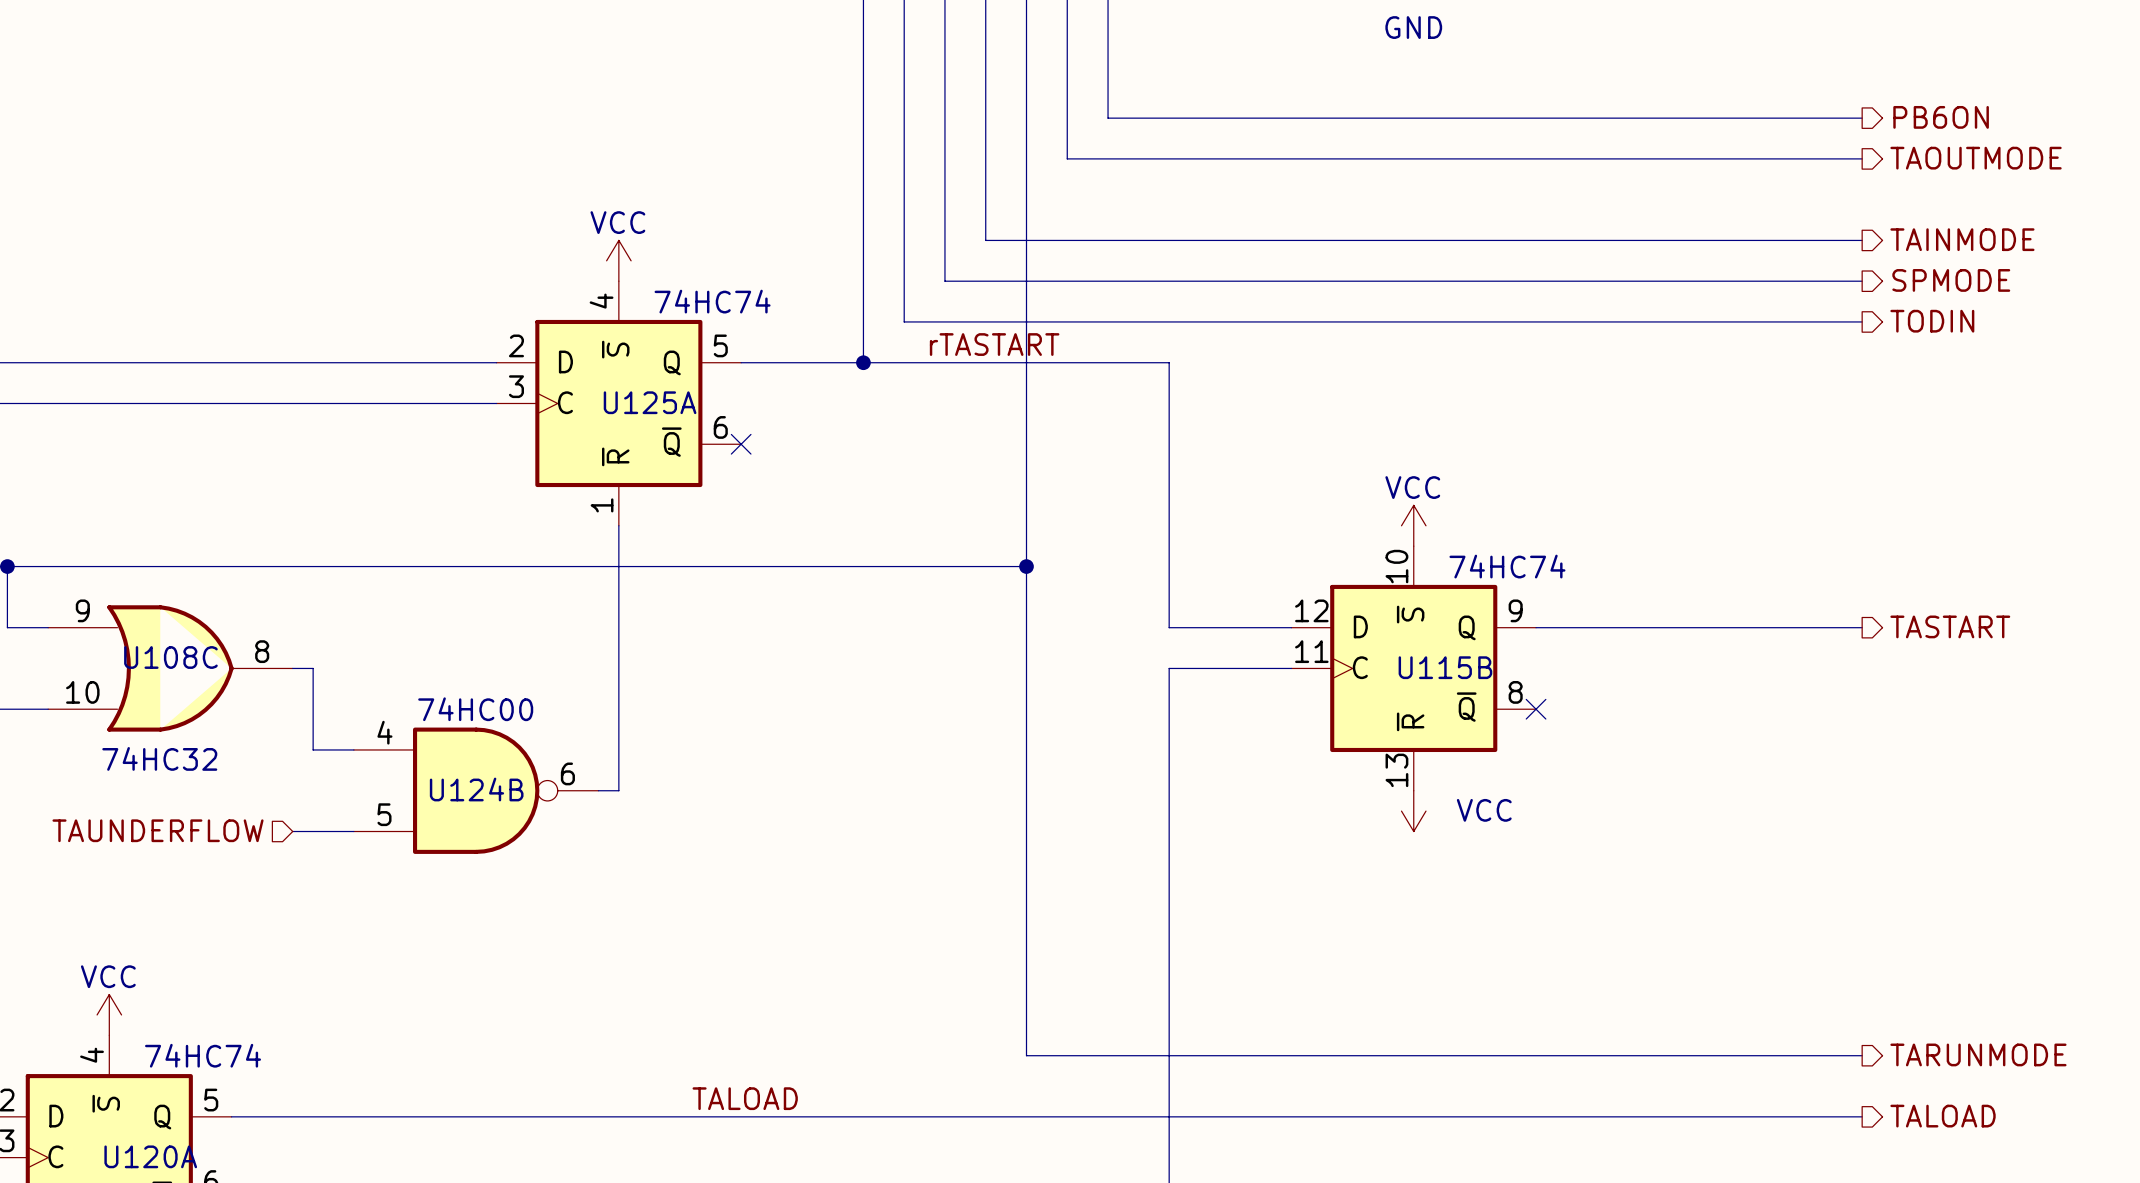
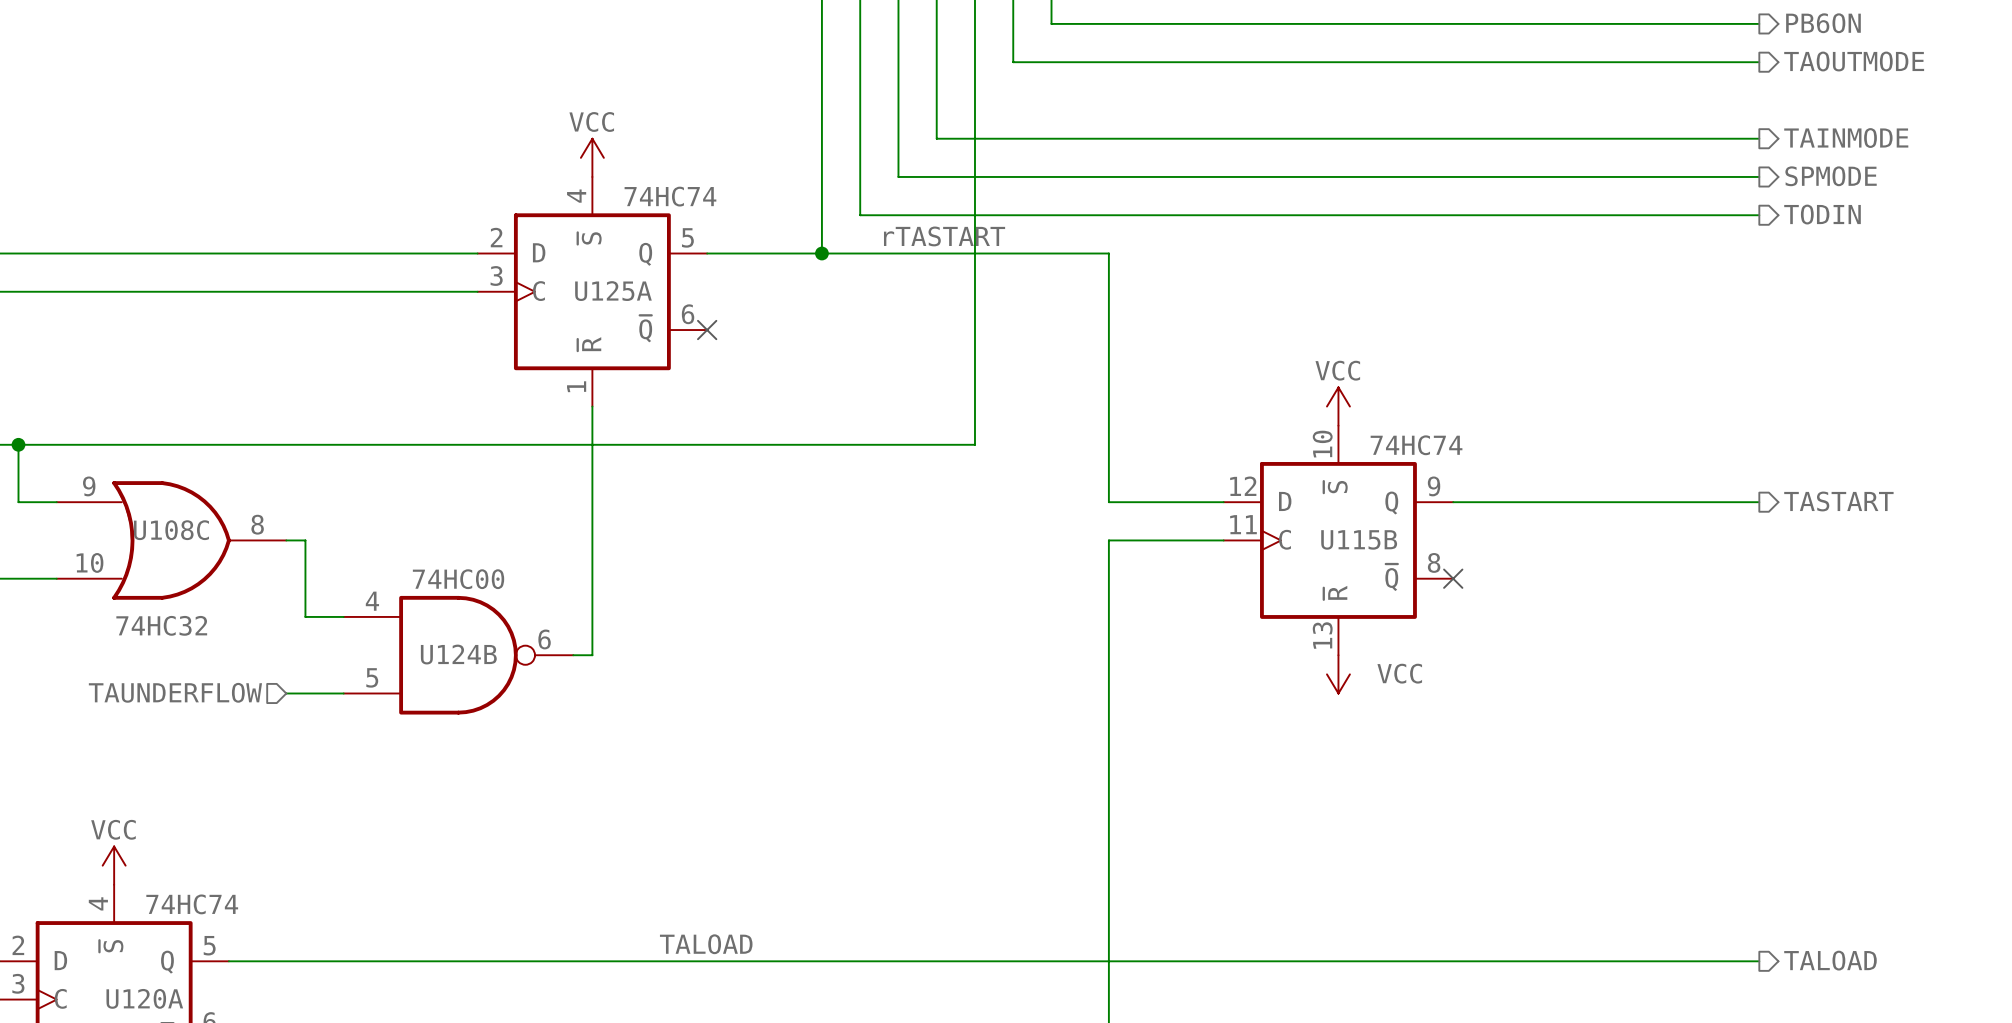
wire: (1026, 566) (1026, 1055) (1862, 1055) -> none
junction: (1026, 566) -> none
hierarchical label: TARUNMODE (1978, 1054) -> none

